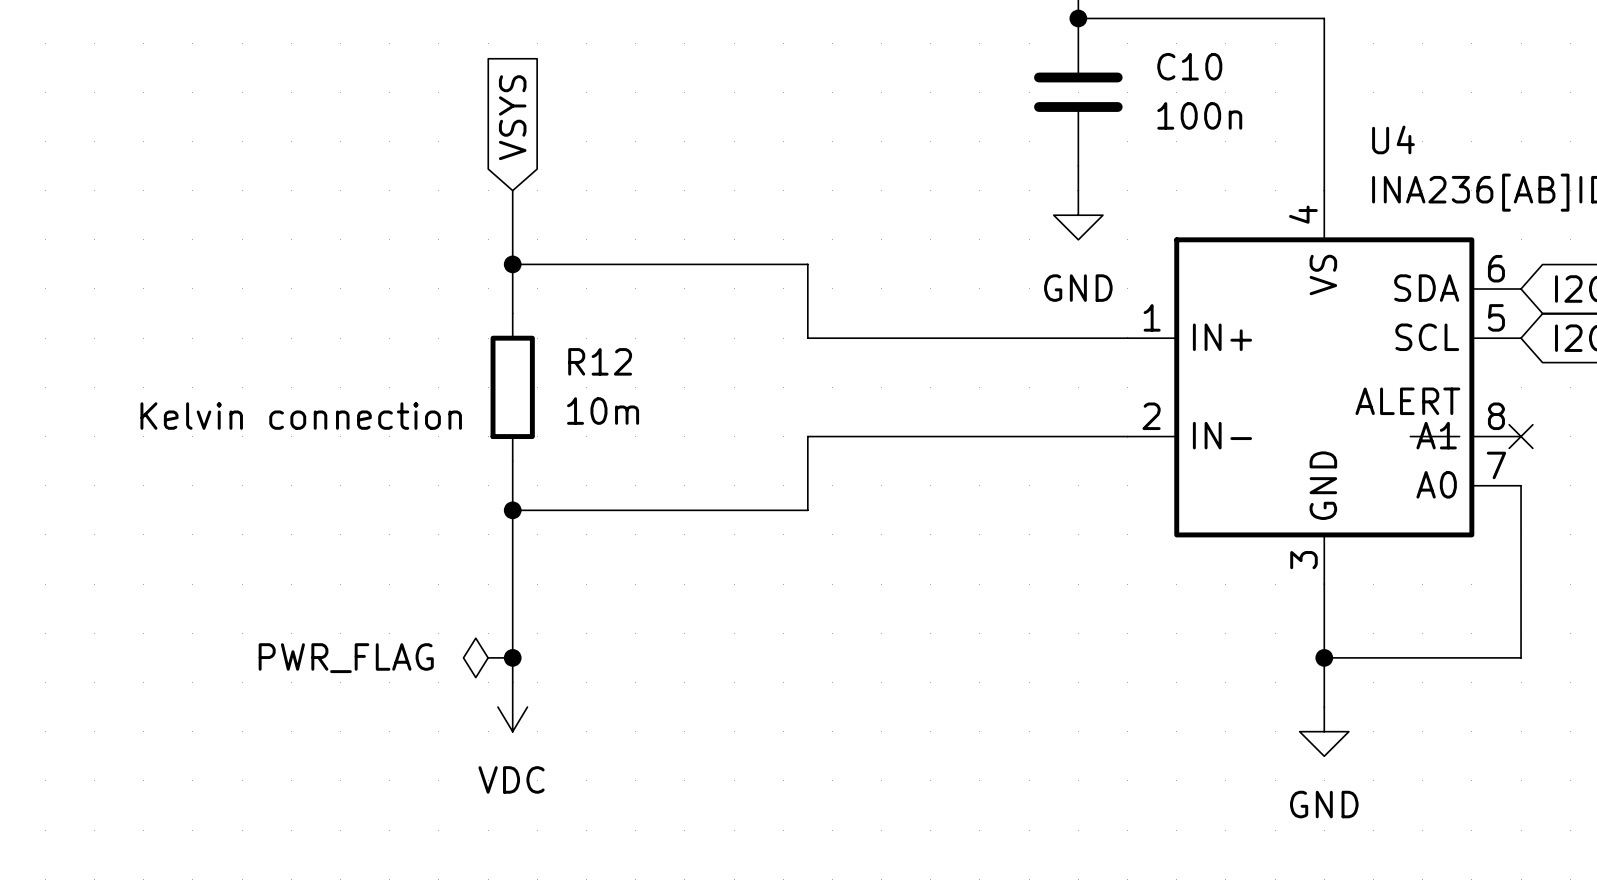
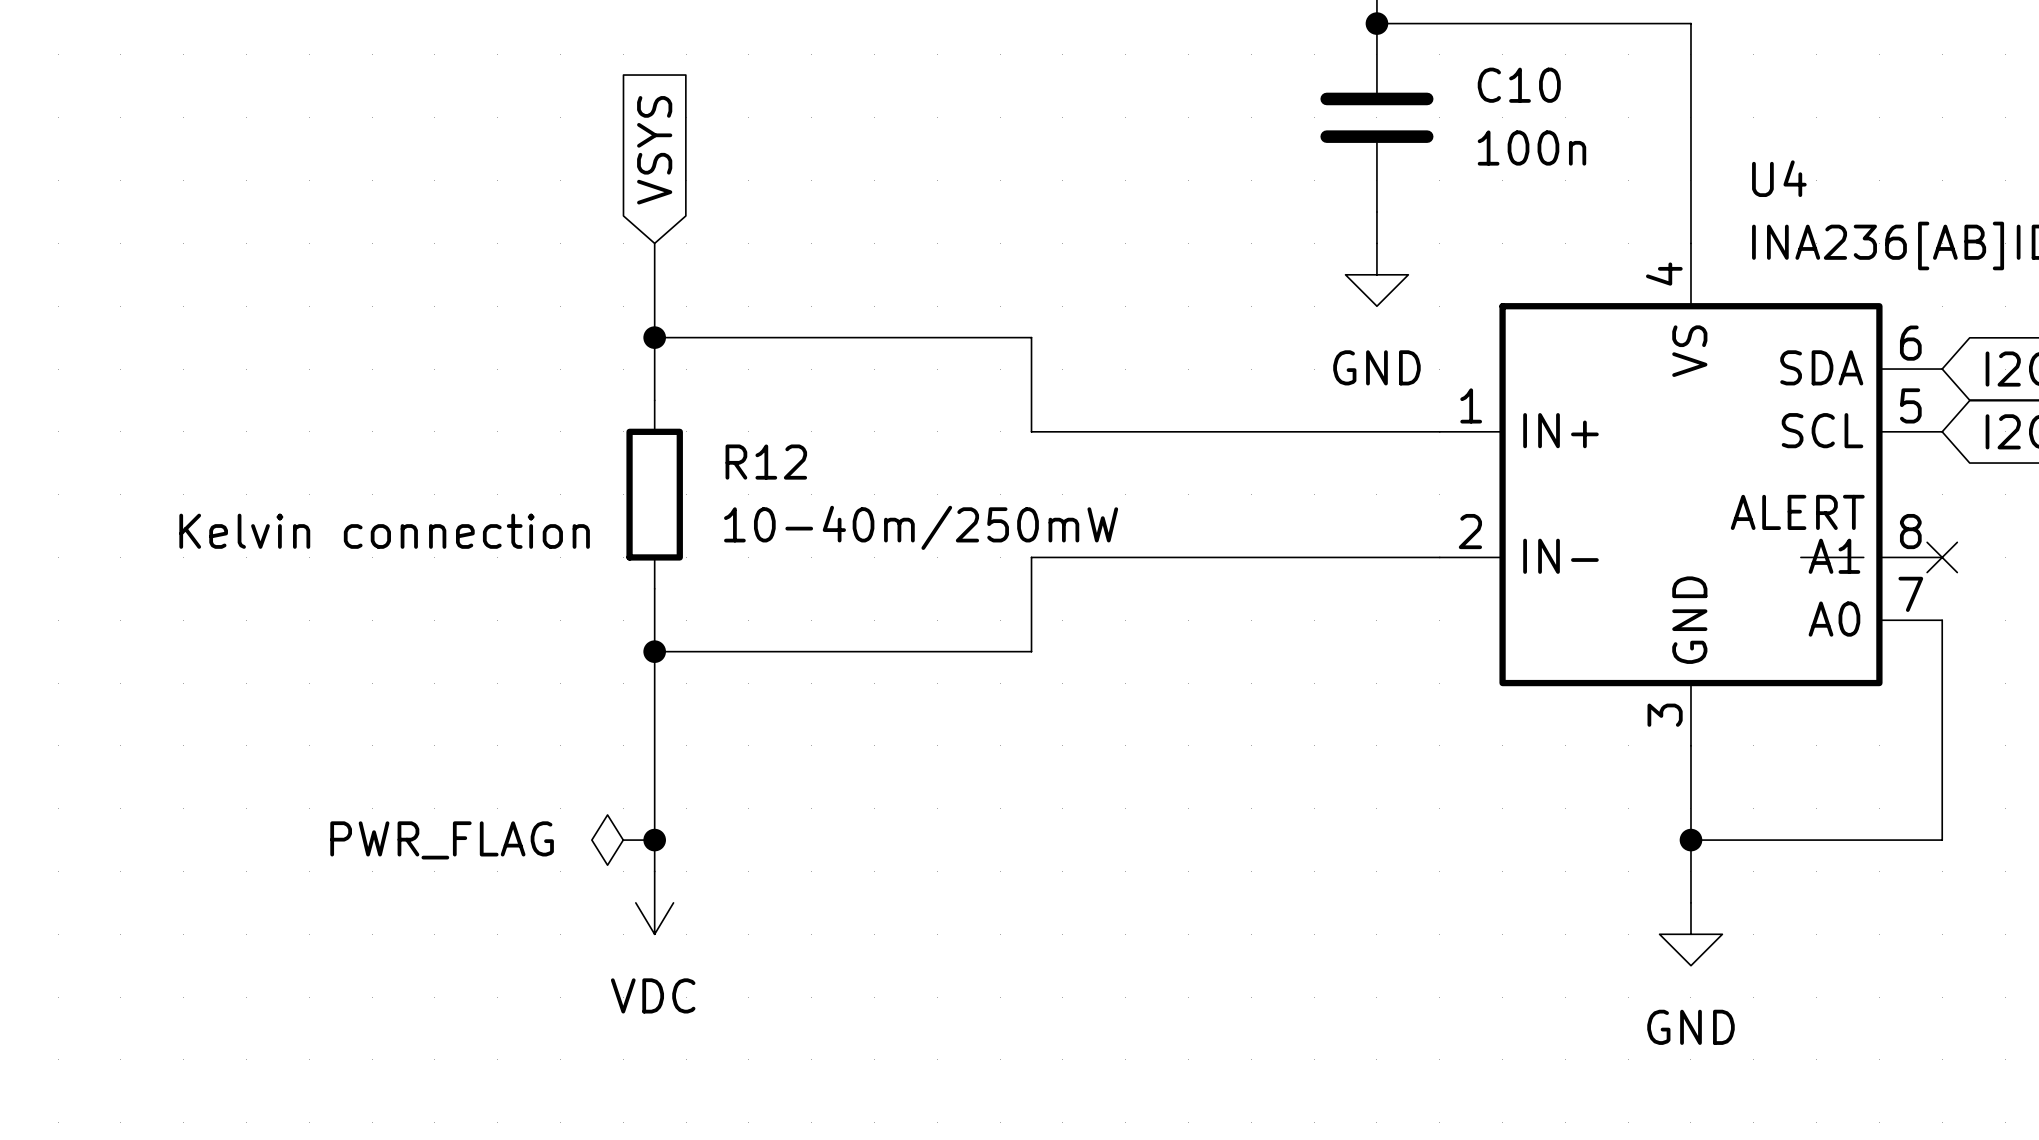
R12 value: 10m (603, 411) -> 10-40m/250mW (921, 527)

